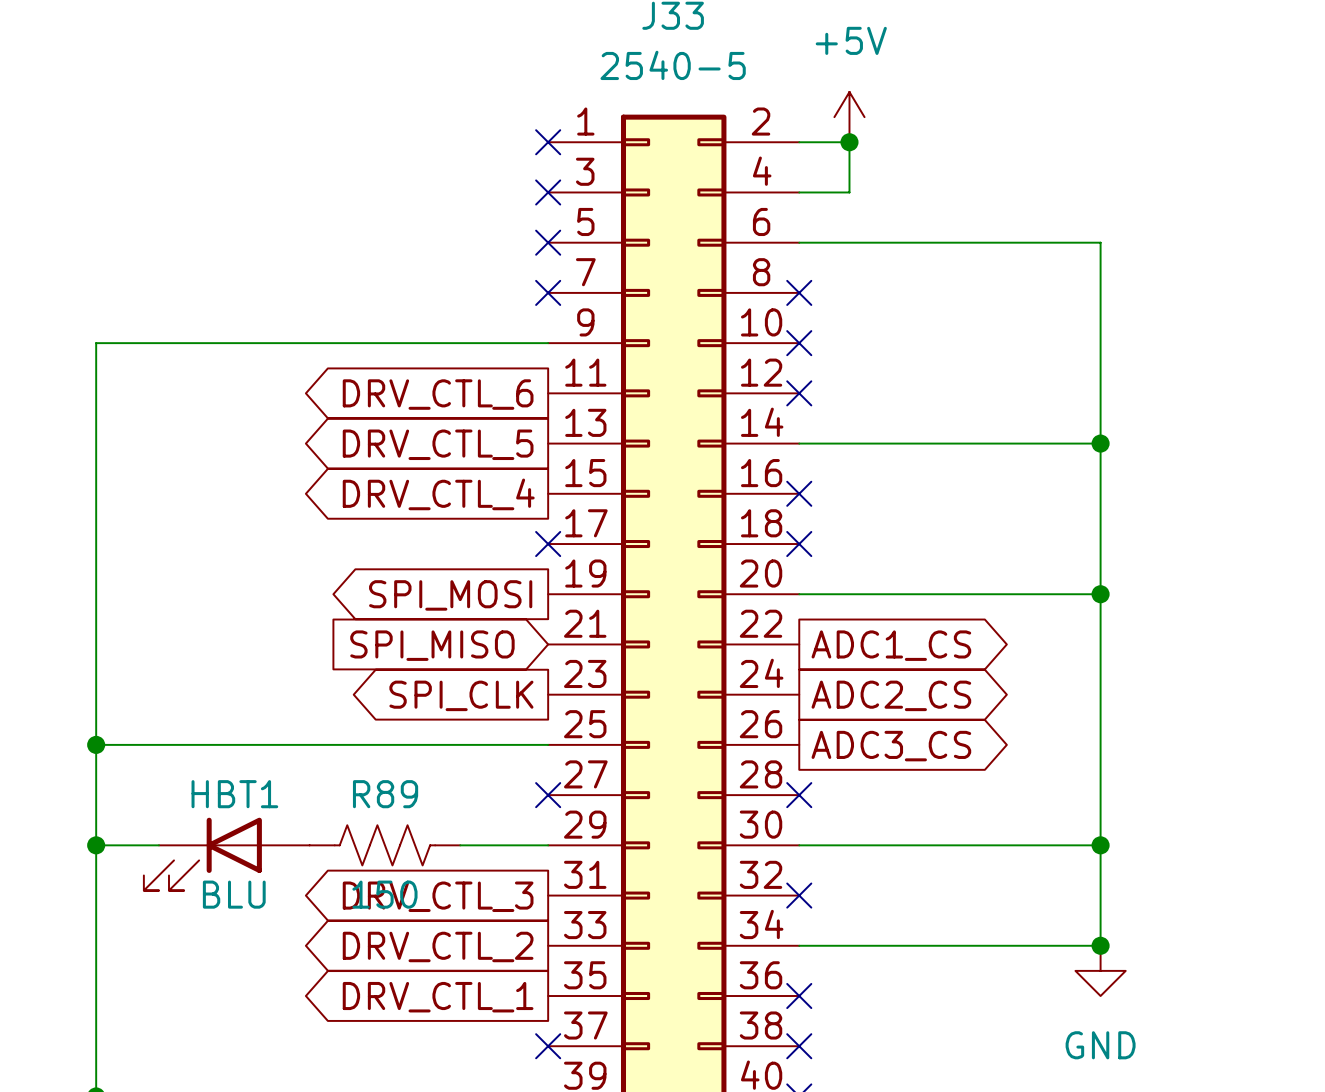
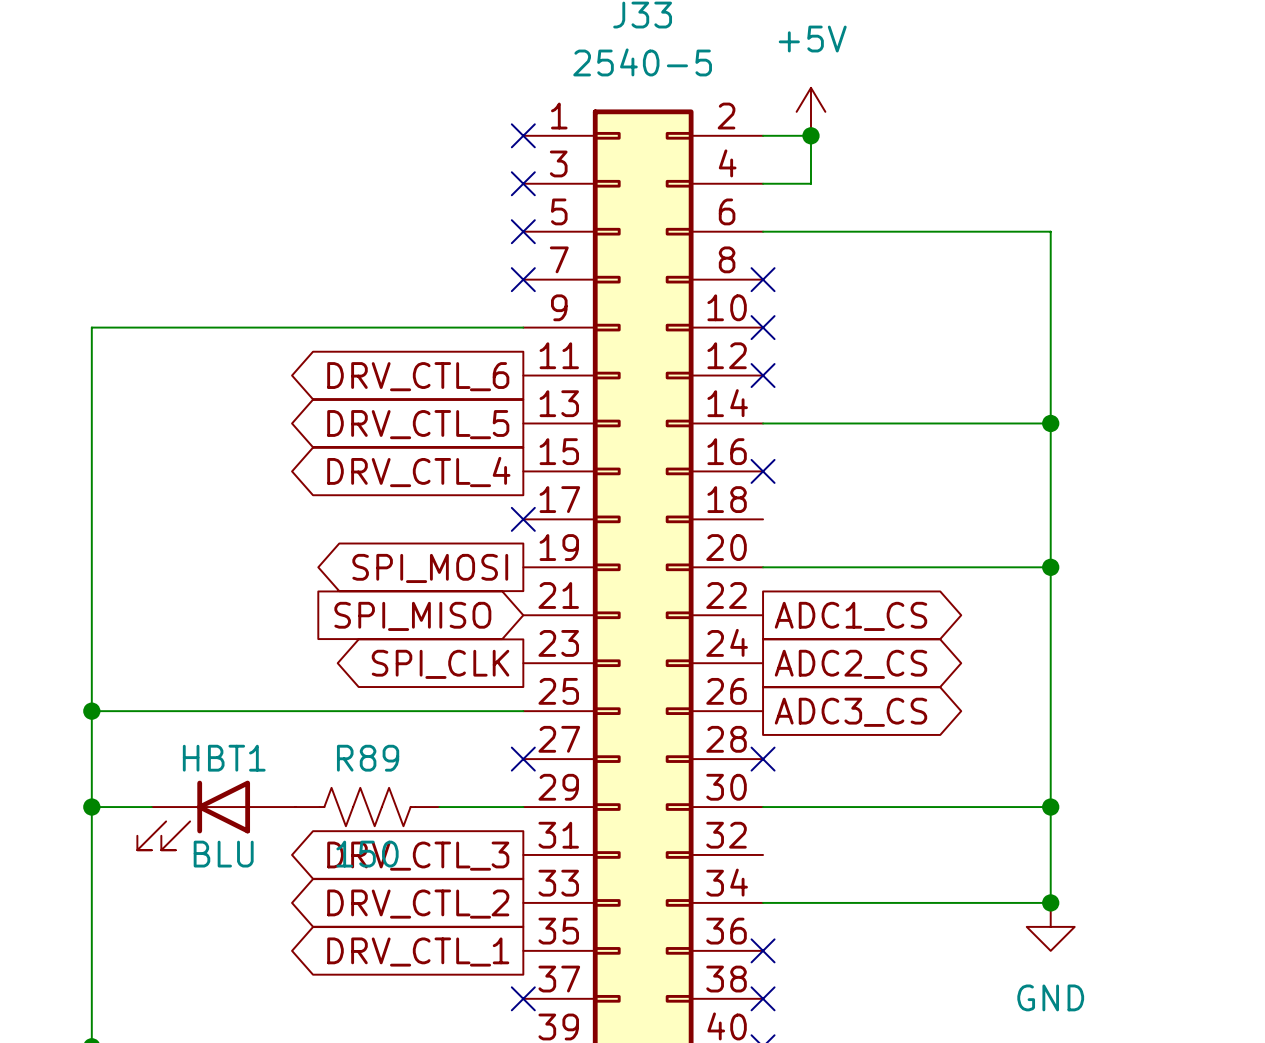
no-connect mark: (799, 544) -> none
no-connect mark: (799, 895) -> none

